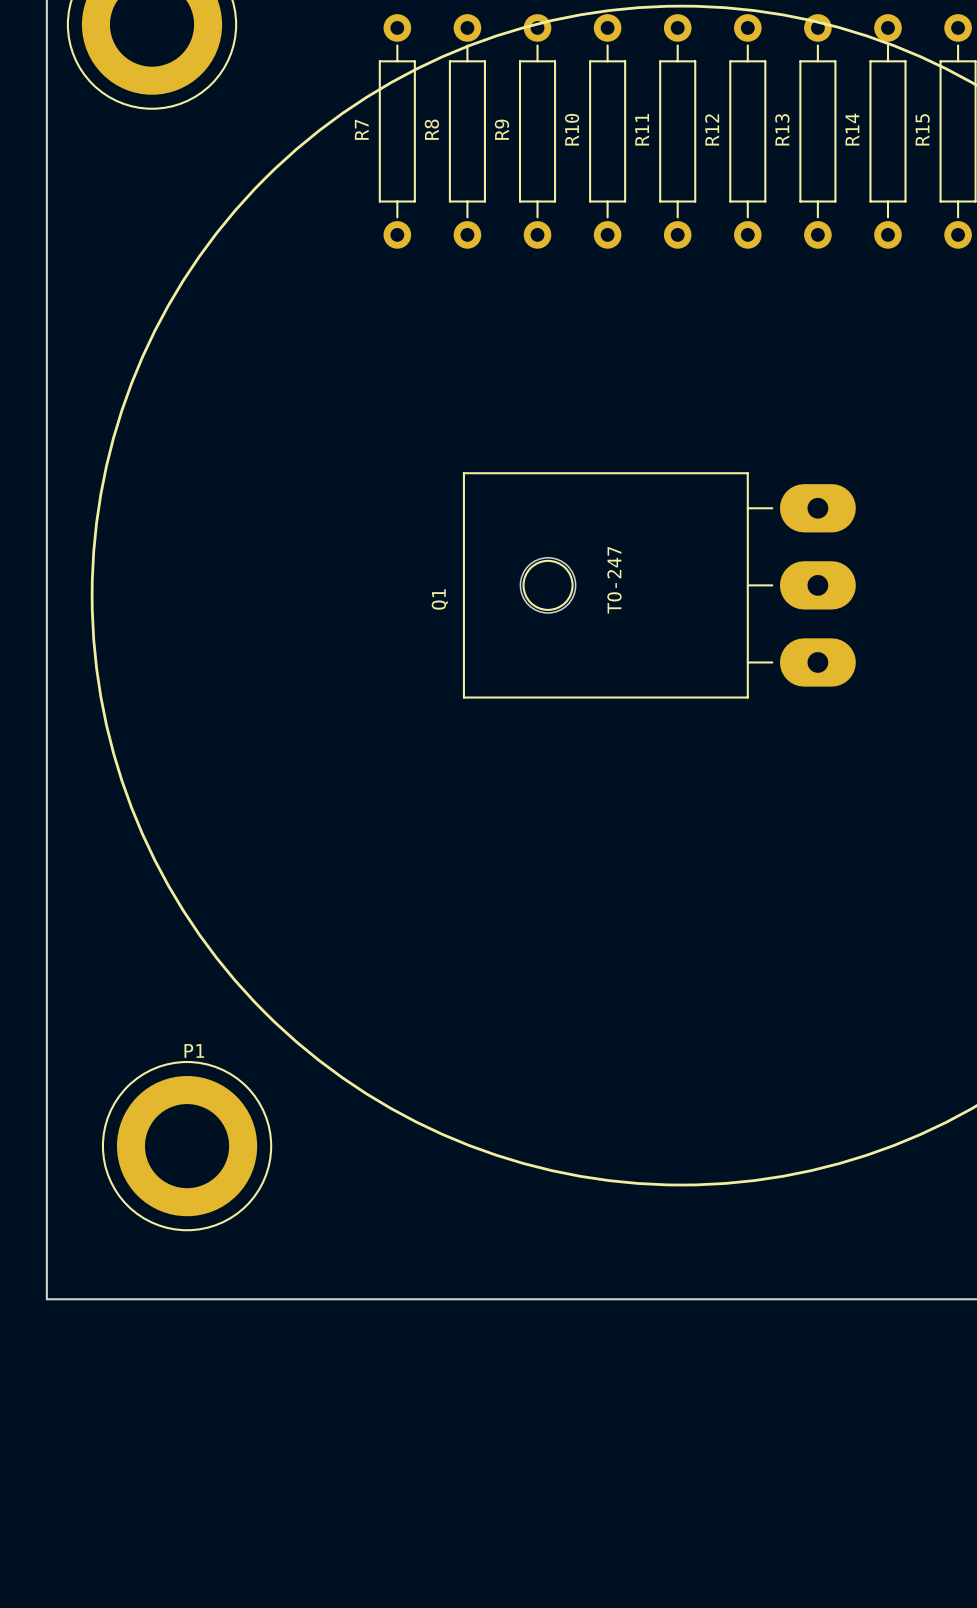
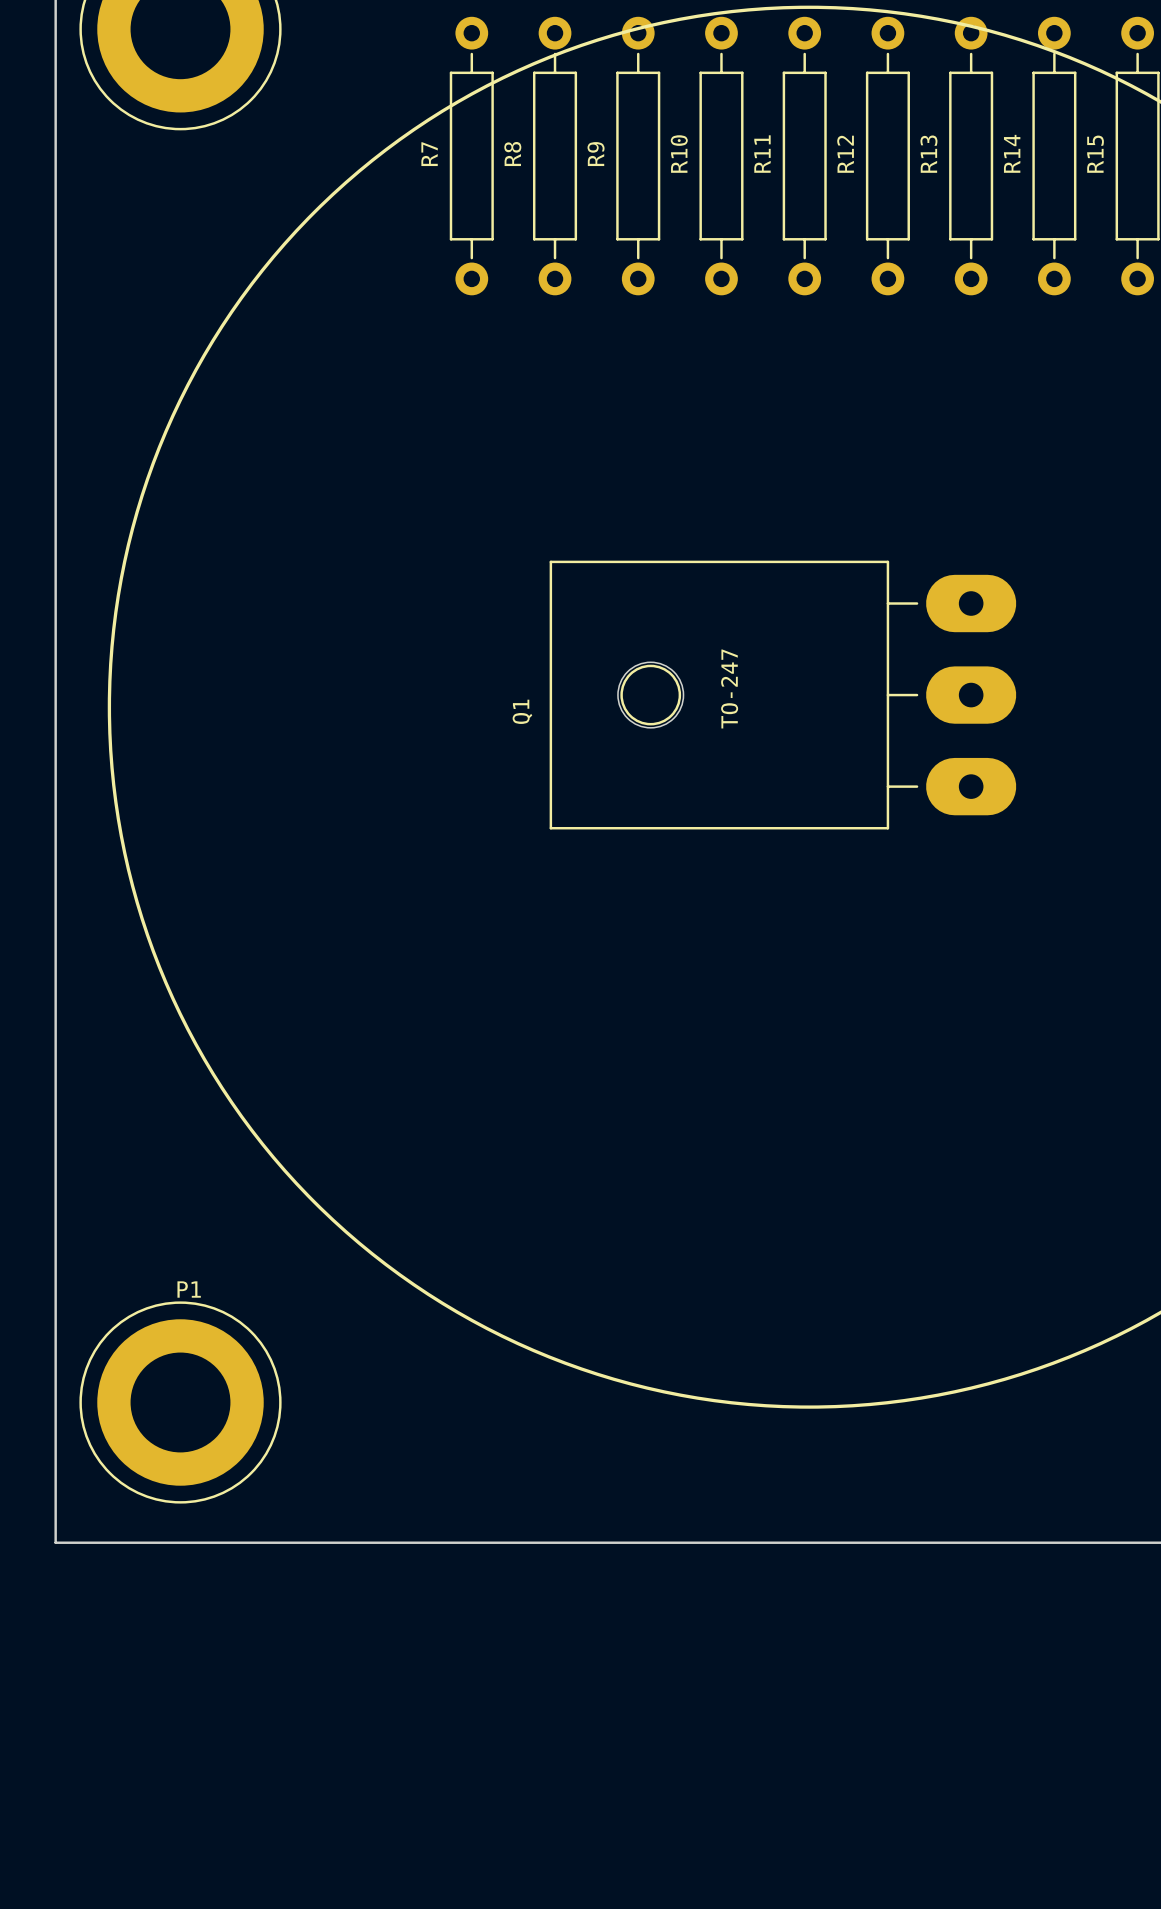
P1 position: (187, 1146) -> (180, 1402)

